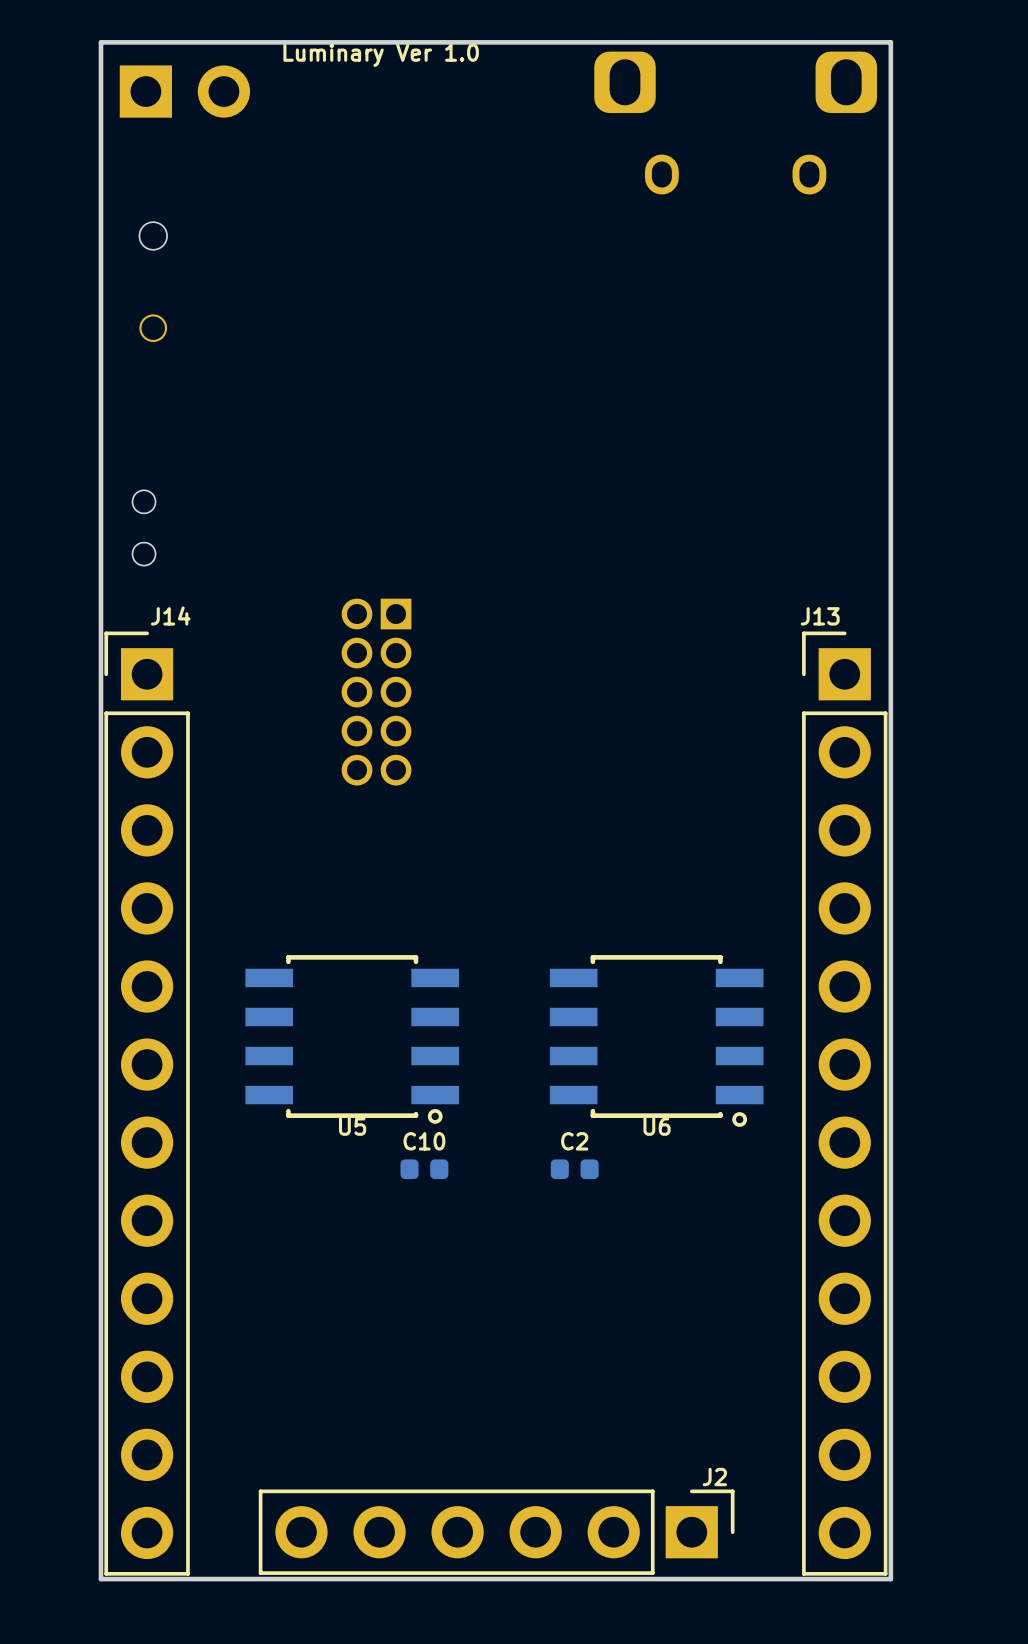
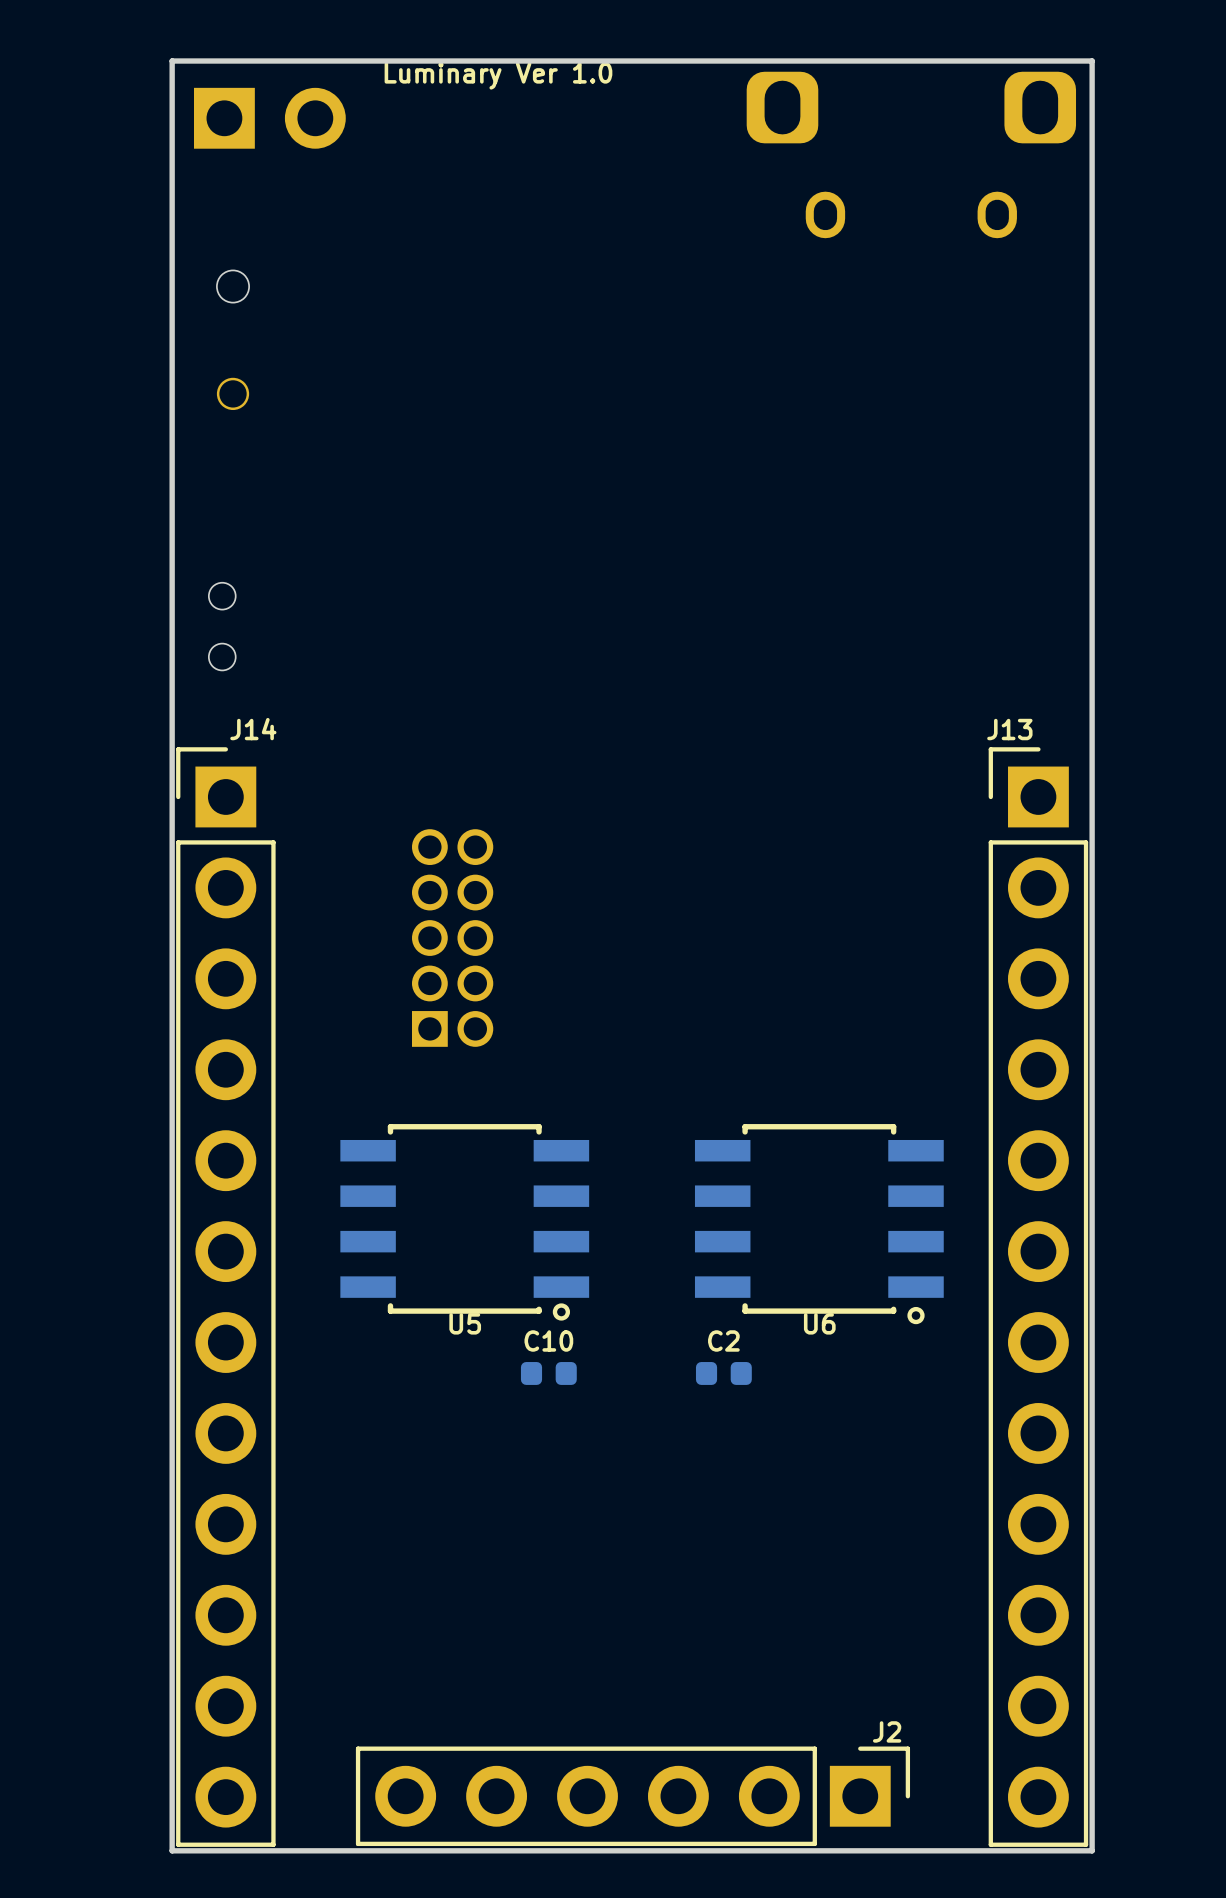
part rotation: 0° (376, 692) -> 180° (452, 938)

